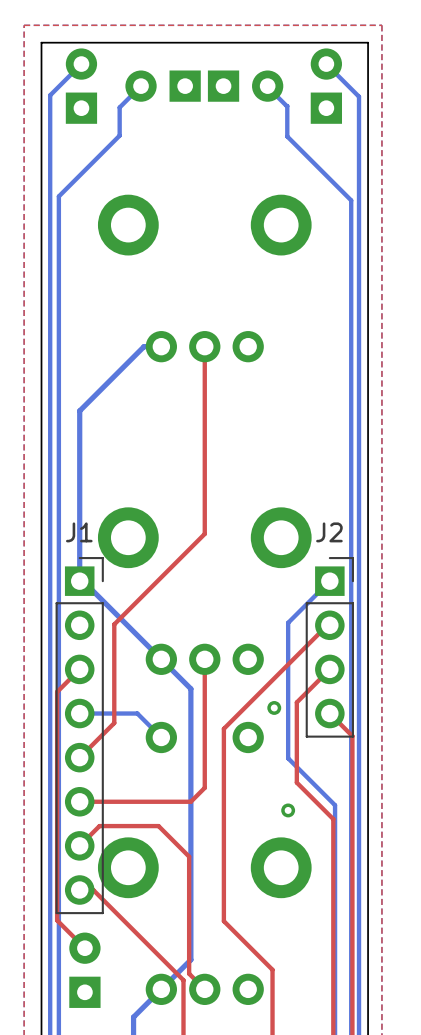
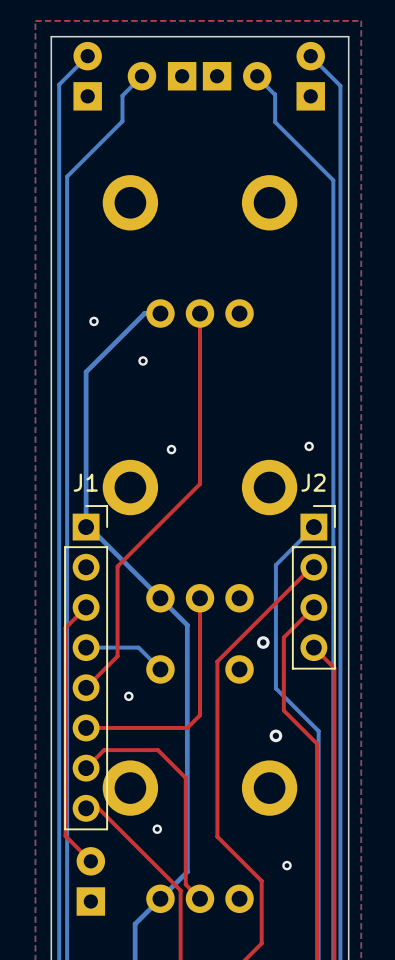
via: none -> (94, 321)
via: none -> (143, 360)
via: none -> (309, 446)
via: none -> (171, 449)
via: none -> (128, 696)
via: none -> (157, 829)
via: none -> (287, 865)

